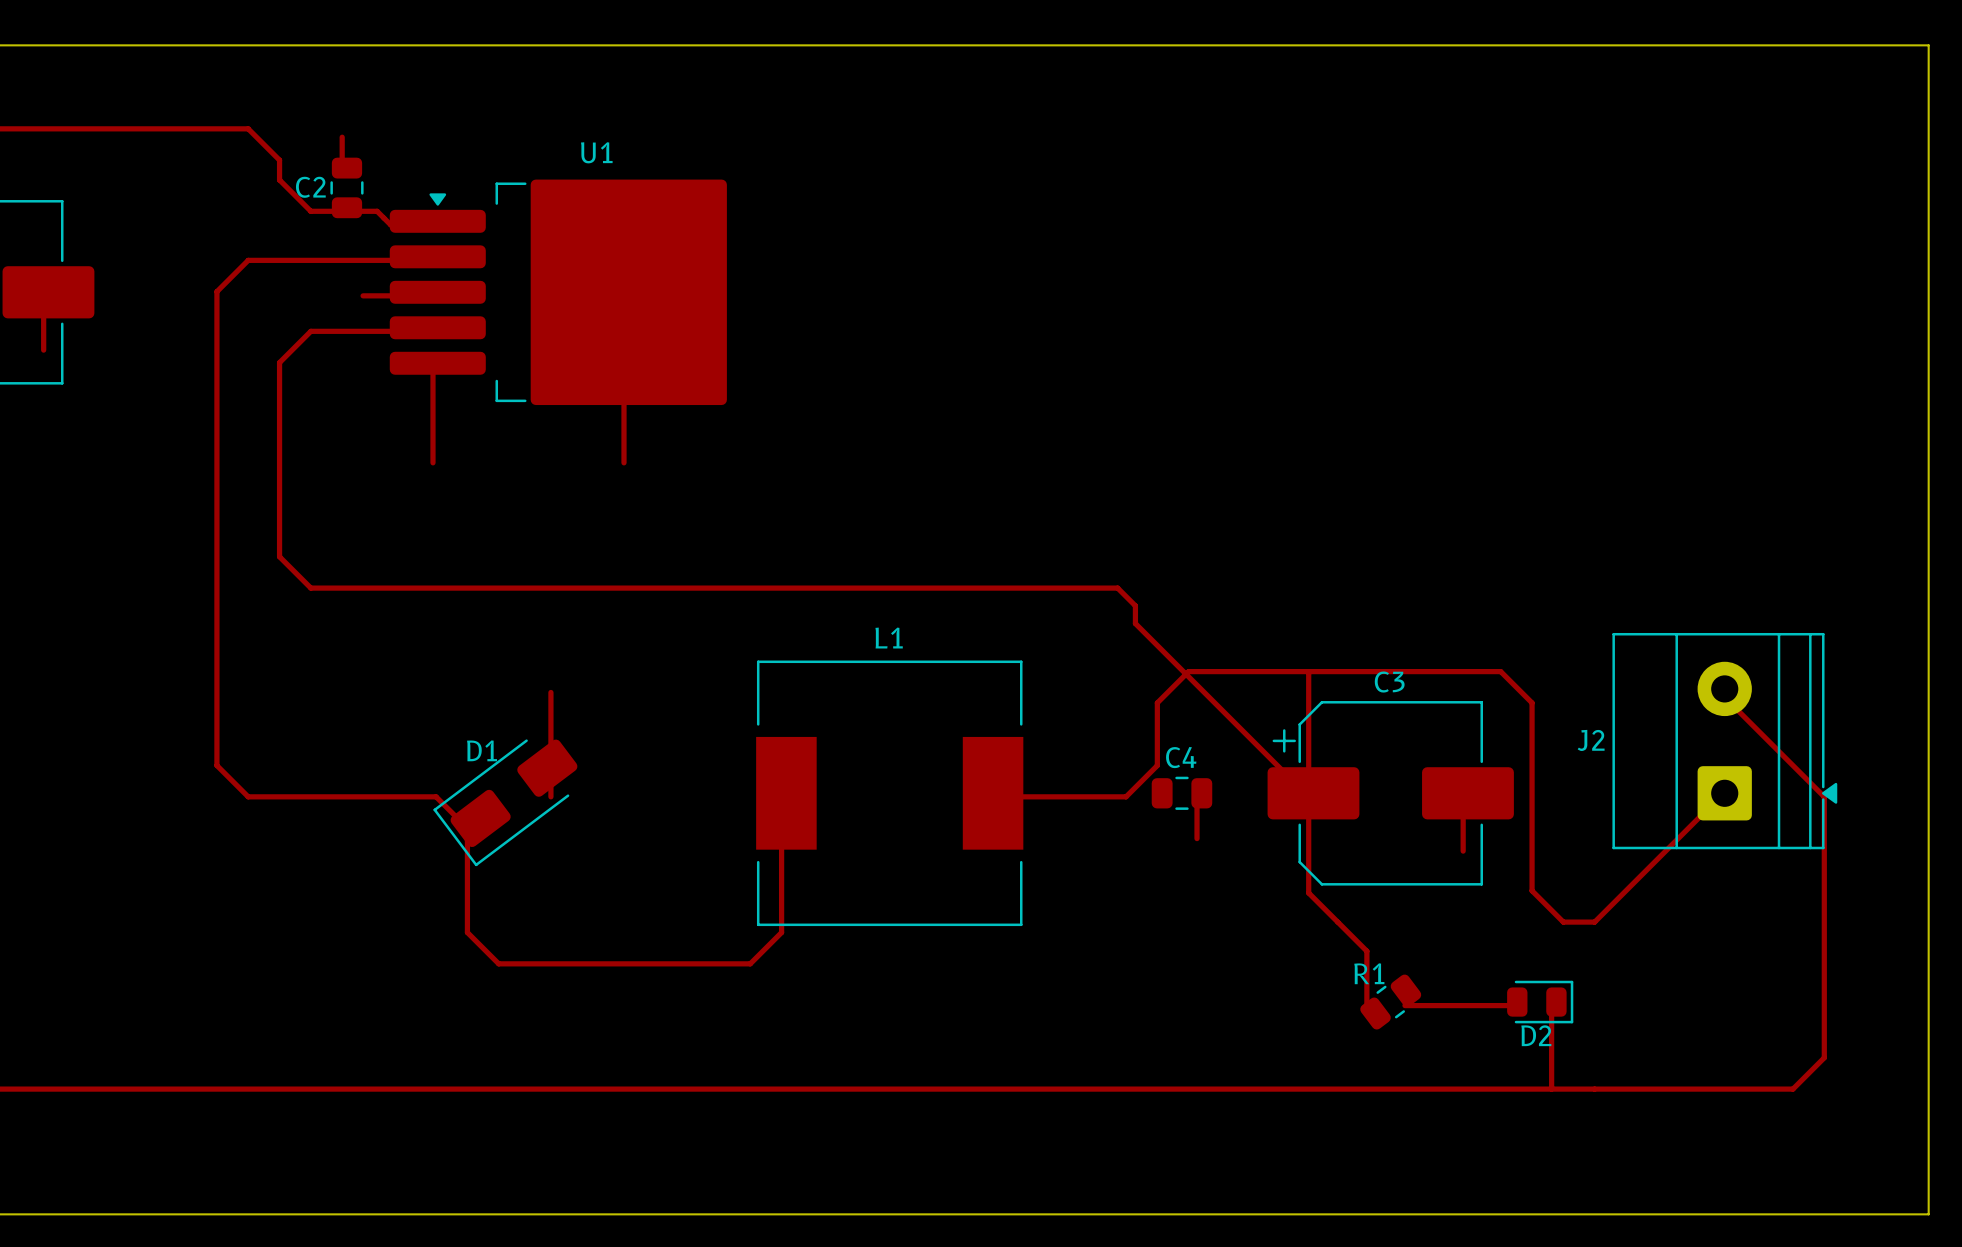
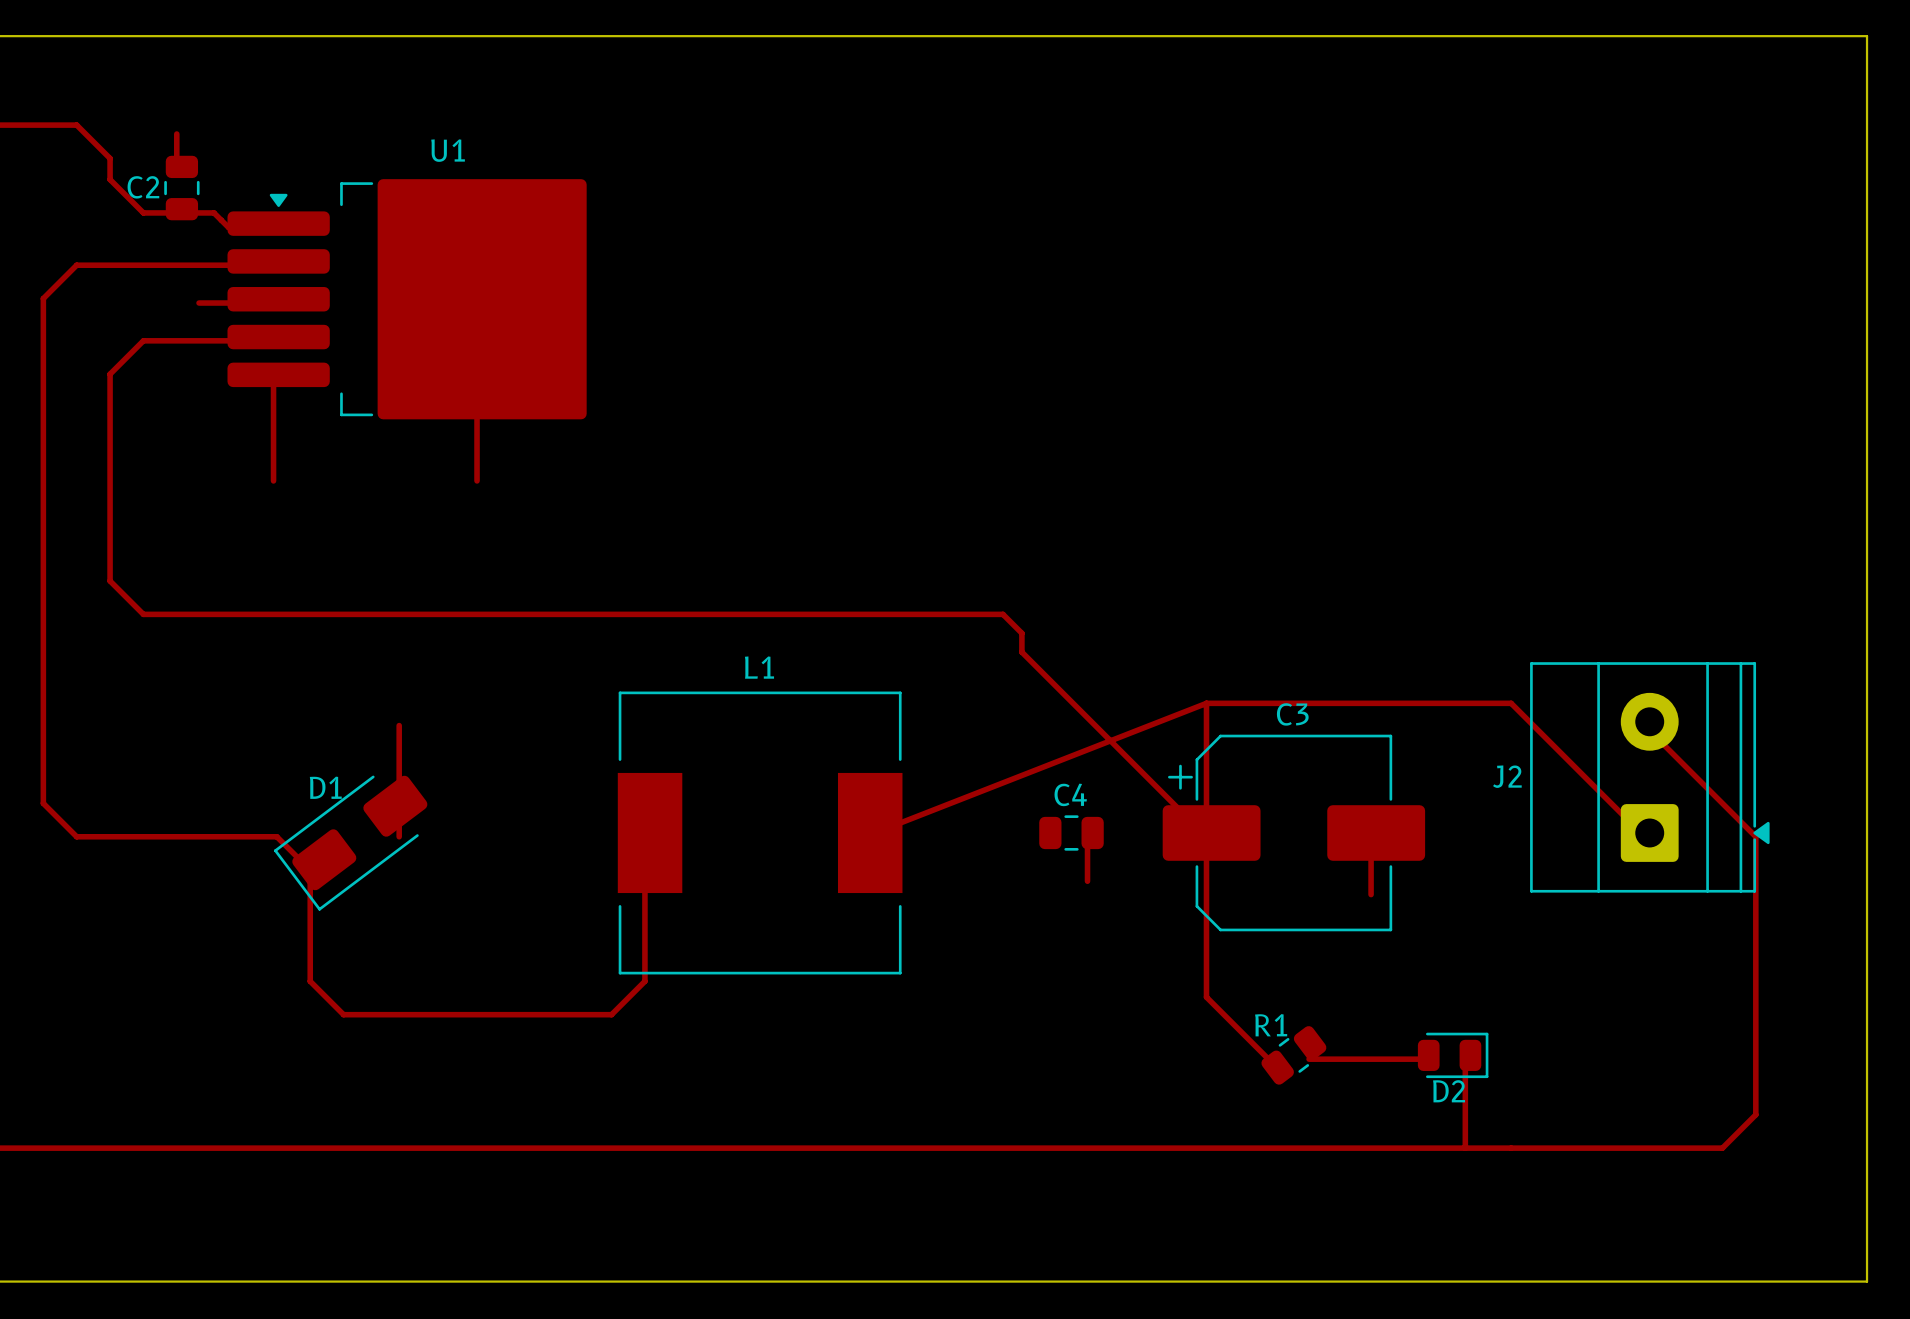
track: (1308, 671) (1188, 671) (1157, 702) (1157, 765) (1126, 796) (988, 796) -> (1206, 703) (865, 836)
track: (1500, 671) (1532, 702) (1532, 890) (1563, 922) (1594, 922) (1719, 796) -> (1411, 703) (1511, 703) (1644, 836)
track: (1308, 893) (1366, 951) (1366, 1005) -> (1206, 939) (1206, 997) (1268, 1059)

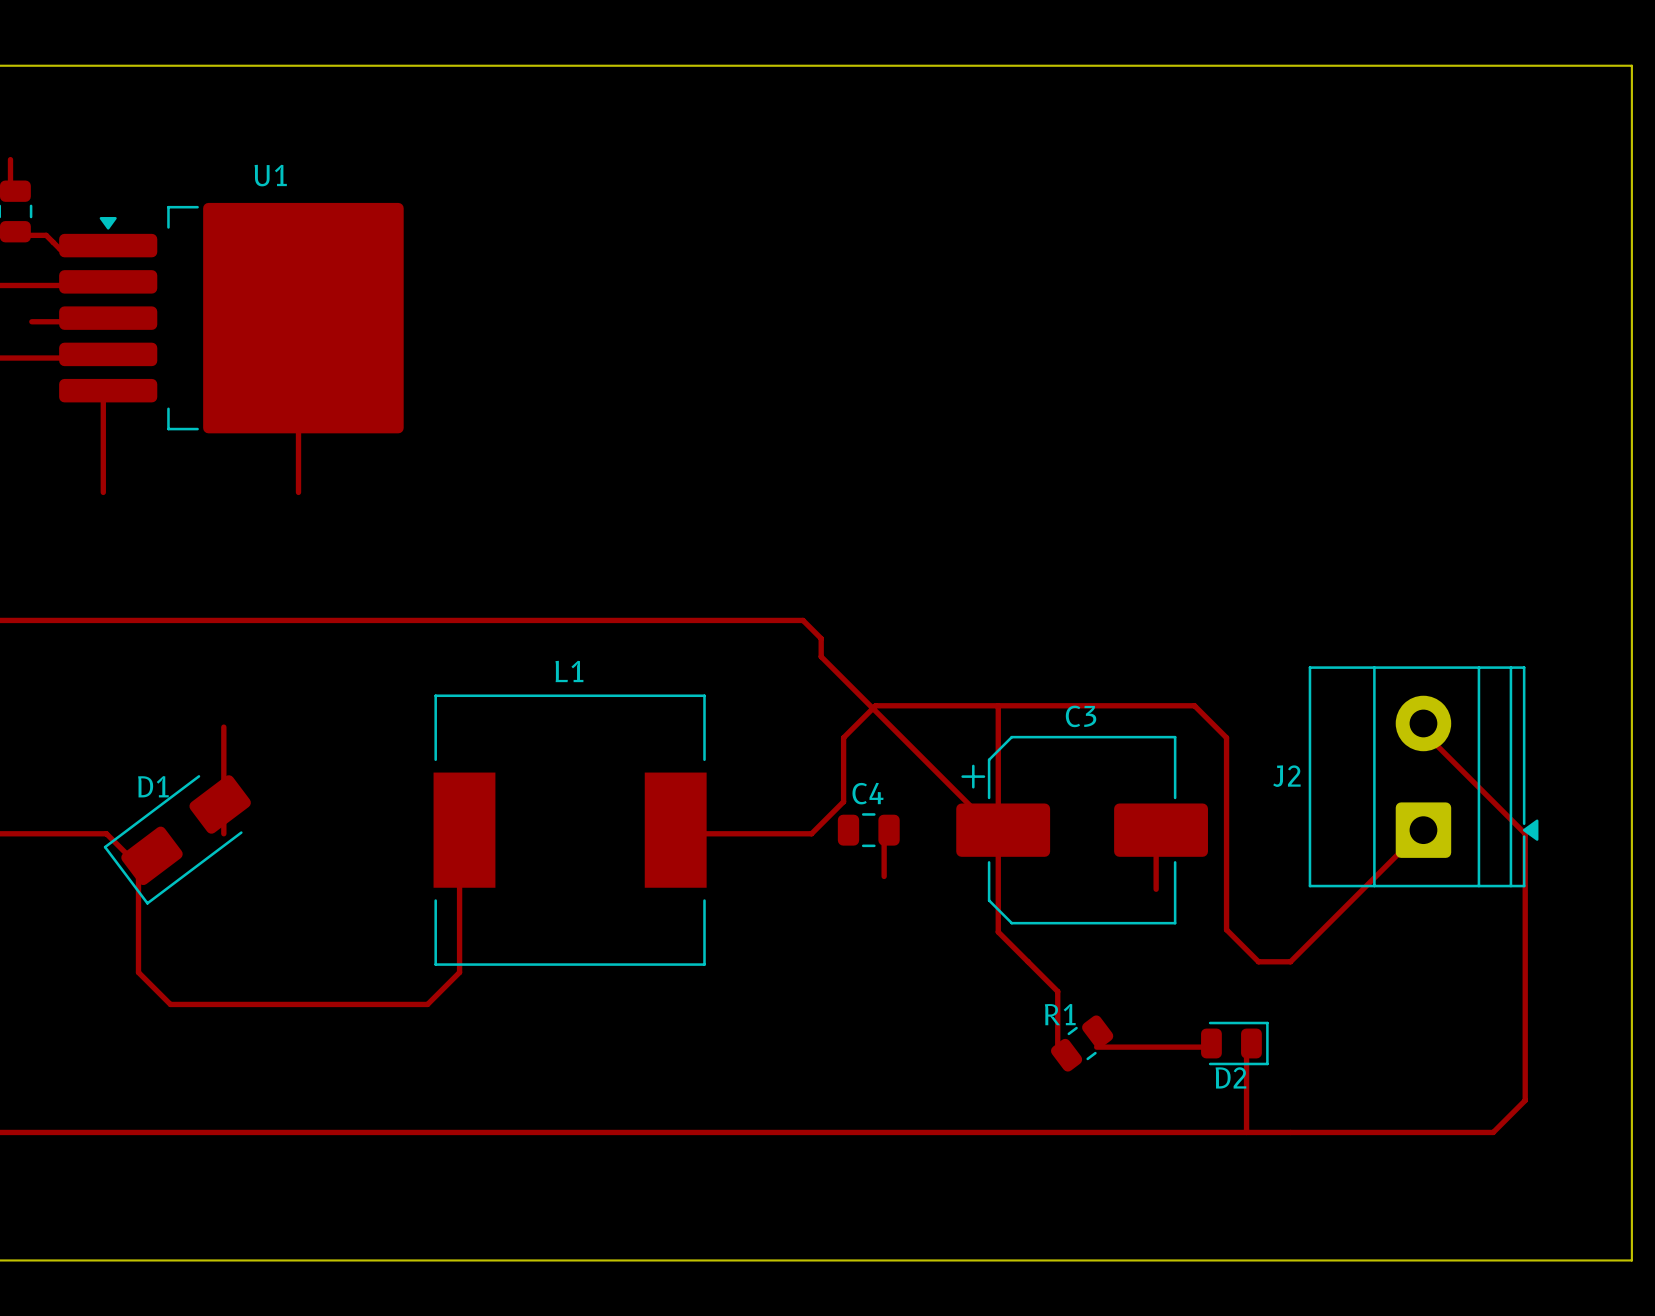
track: (1206, 703) (865, 836) -> (998, 705) (875, 705) (843, 737) (843, 801) (811, 833) (670, 833)
track: (1411, 703) (1511, 703) (1644, 836) -> (1194, 705) (1226, 737) (1226, 929) (1258, 961) (1290, 961) (1418, 833)
track: (1206, 939) (1206, 997) (1268, 1059) -> (998, 932) (1057, 991) (1057, 1047)

